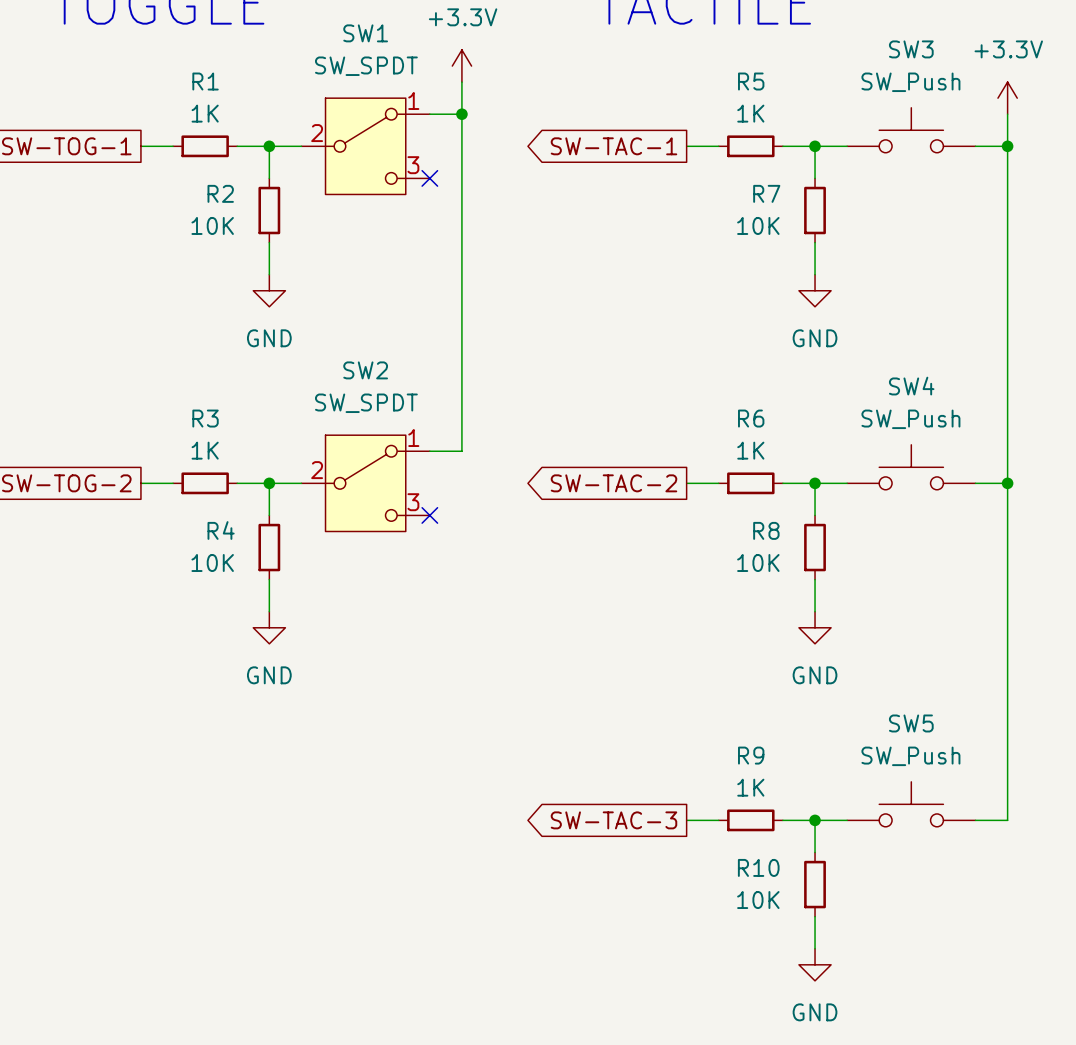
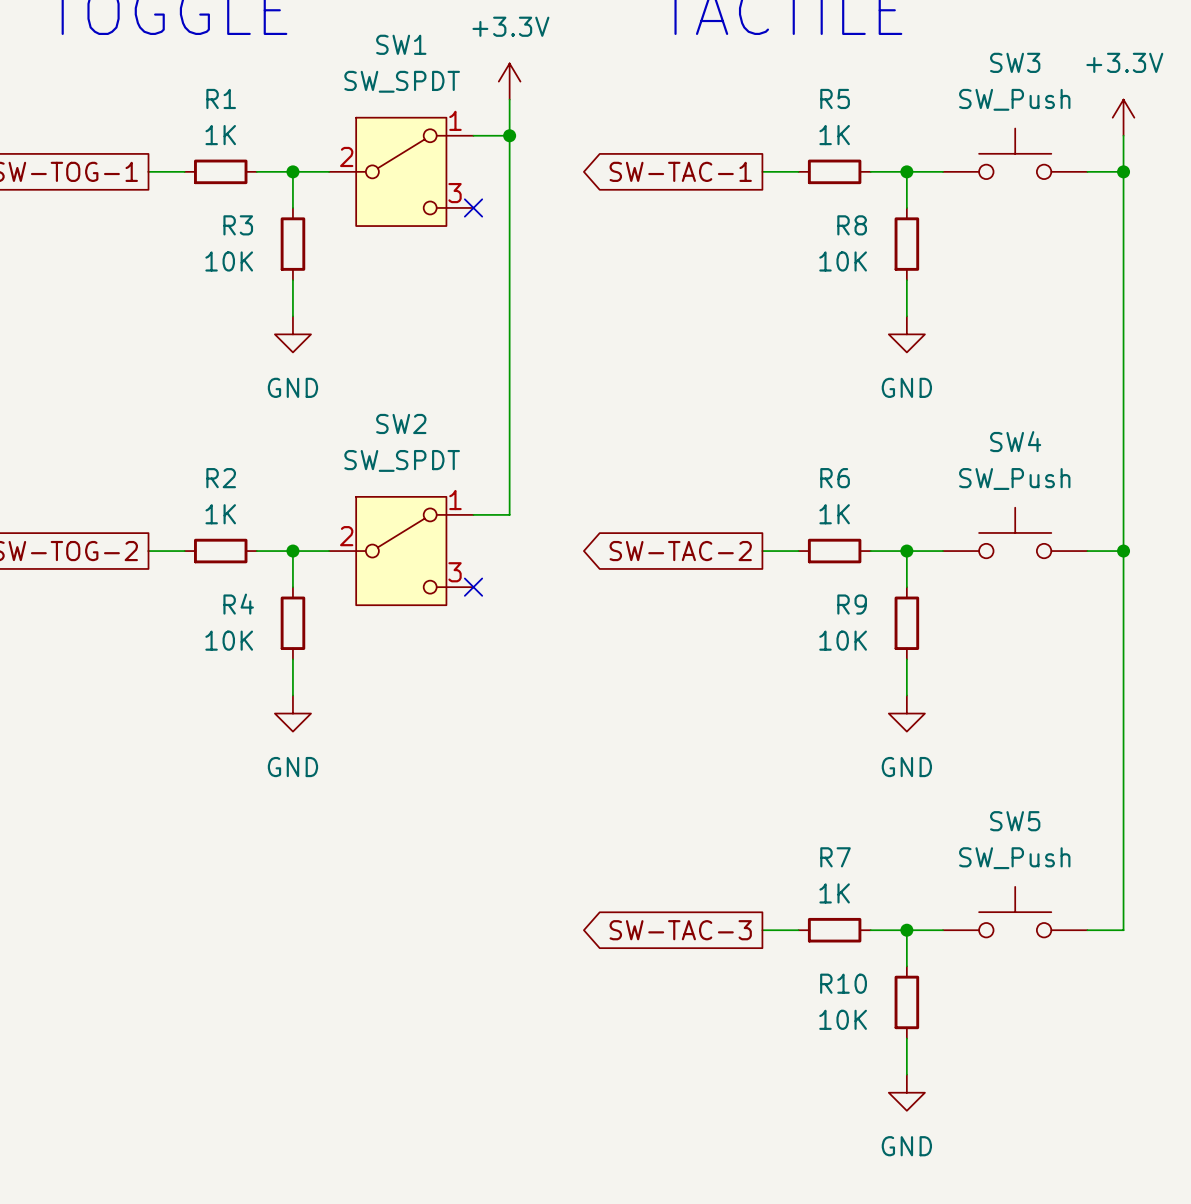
R2 name: R2 (220, 193) -> R3 (238, 225)
R7 name: R7 (766, 193) -> R8 (852, 225)
R3 name: R3 (205, 418) -> R2 (221, 478)
R8 name: R8 (766, 530) -> R9 (852, 604)
R9 name: R9 (751, 755) -> R7 (835, 857)

